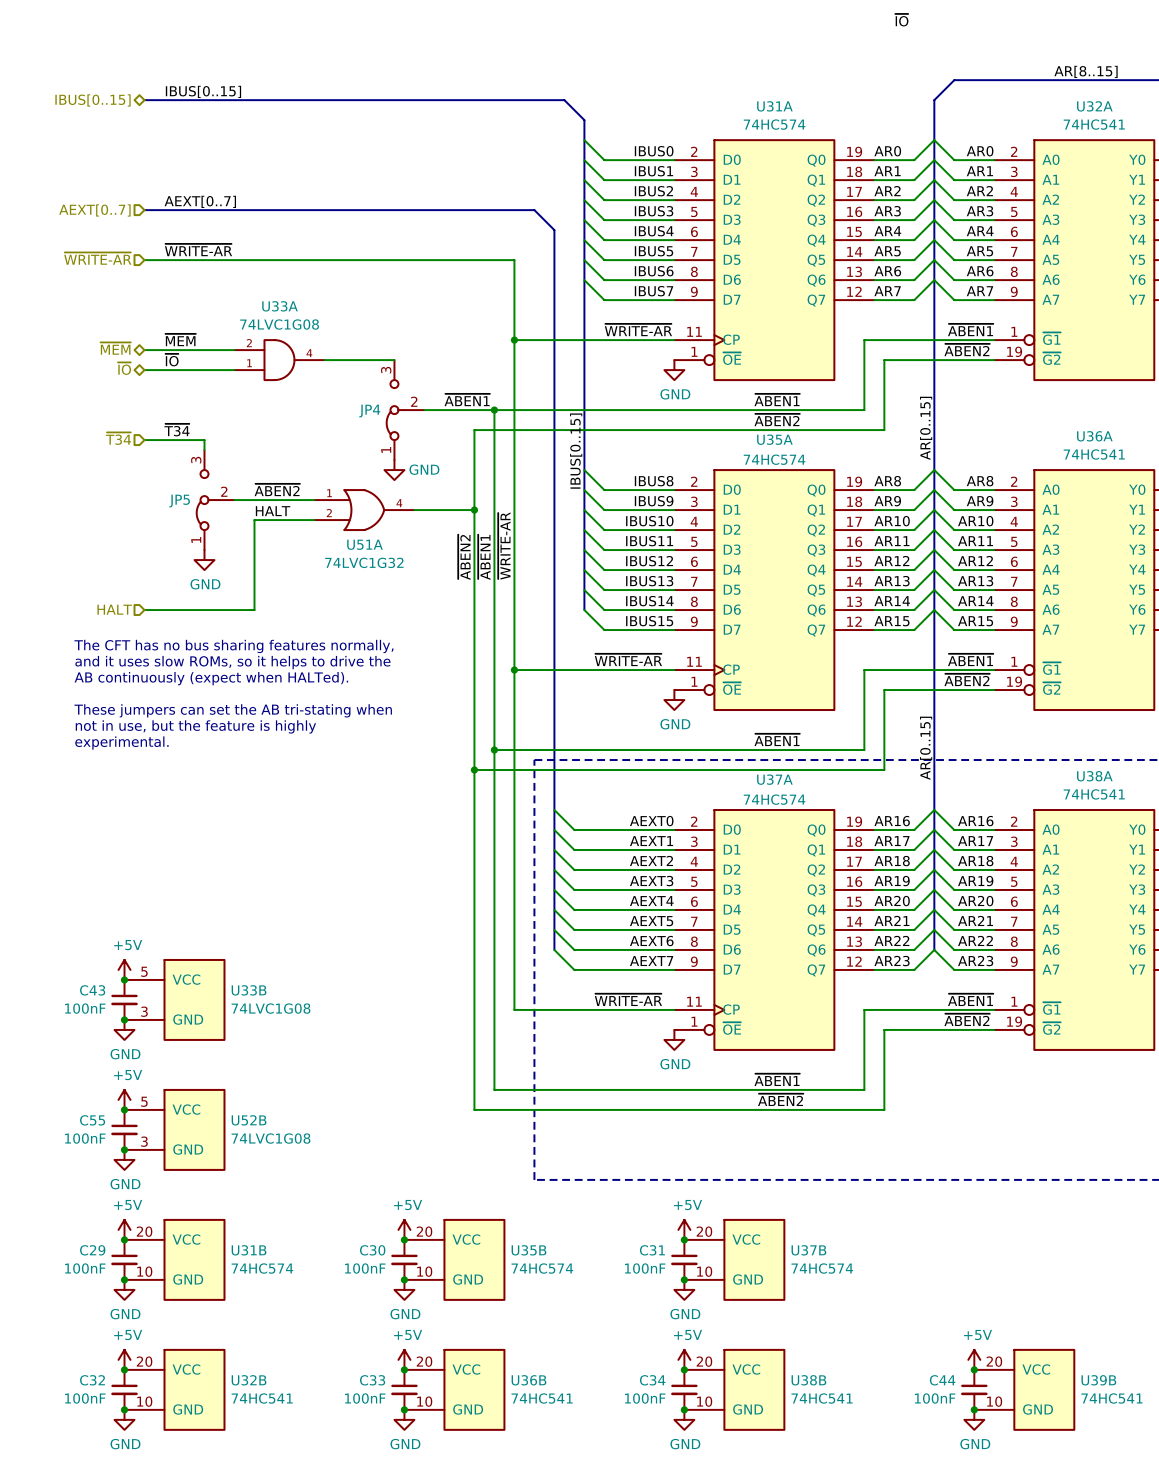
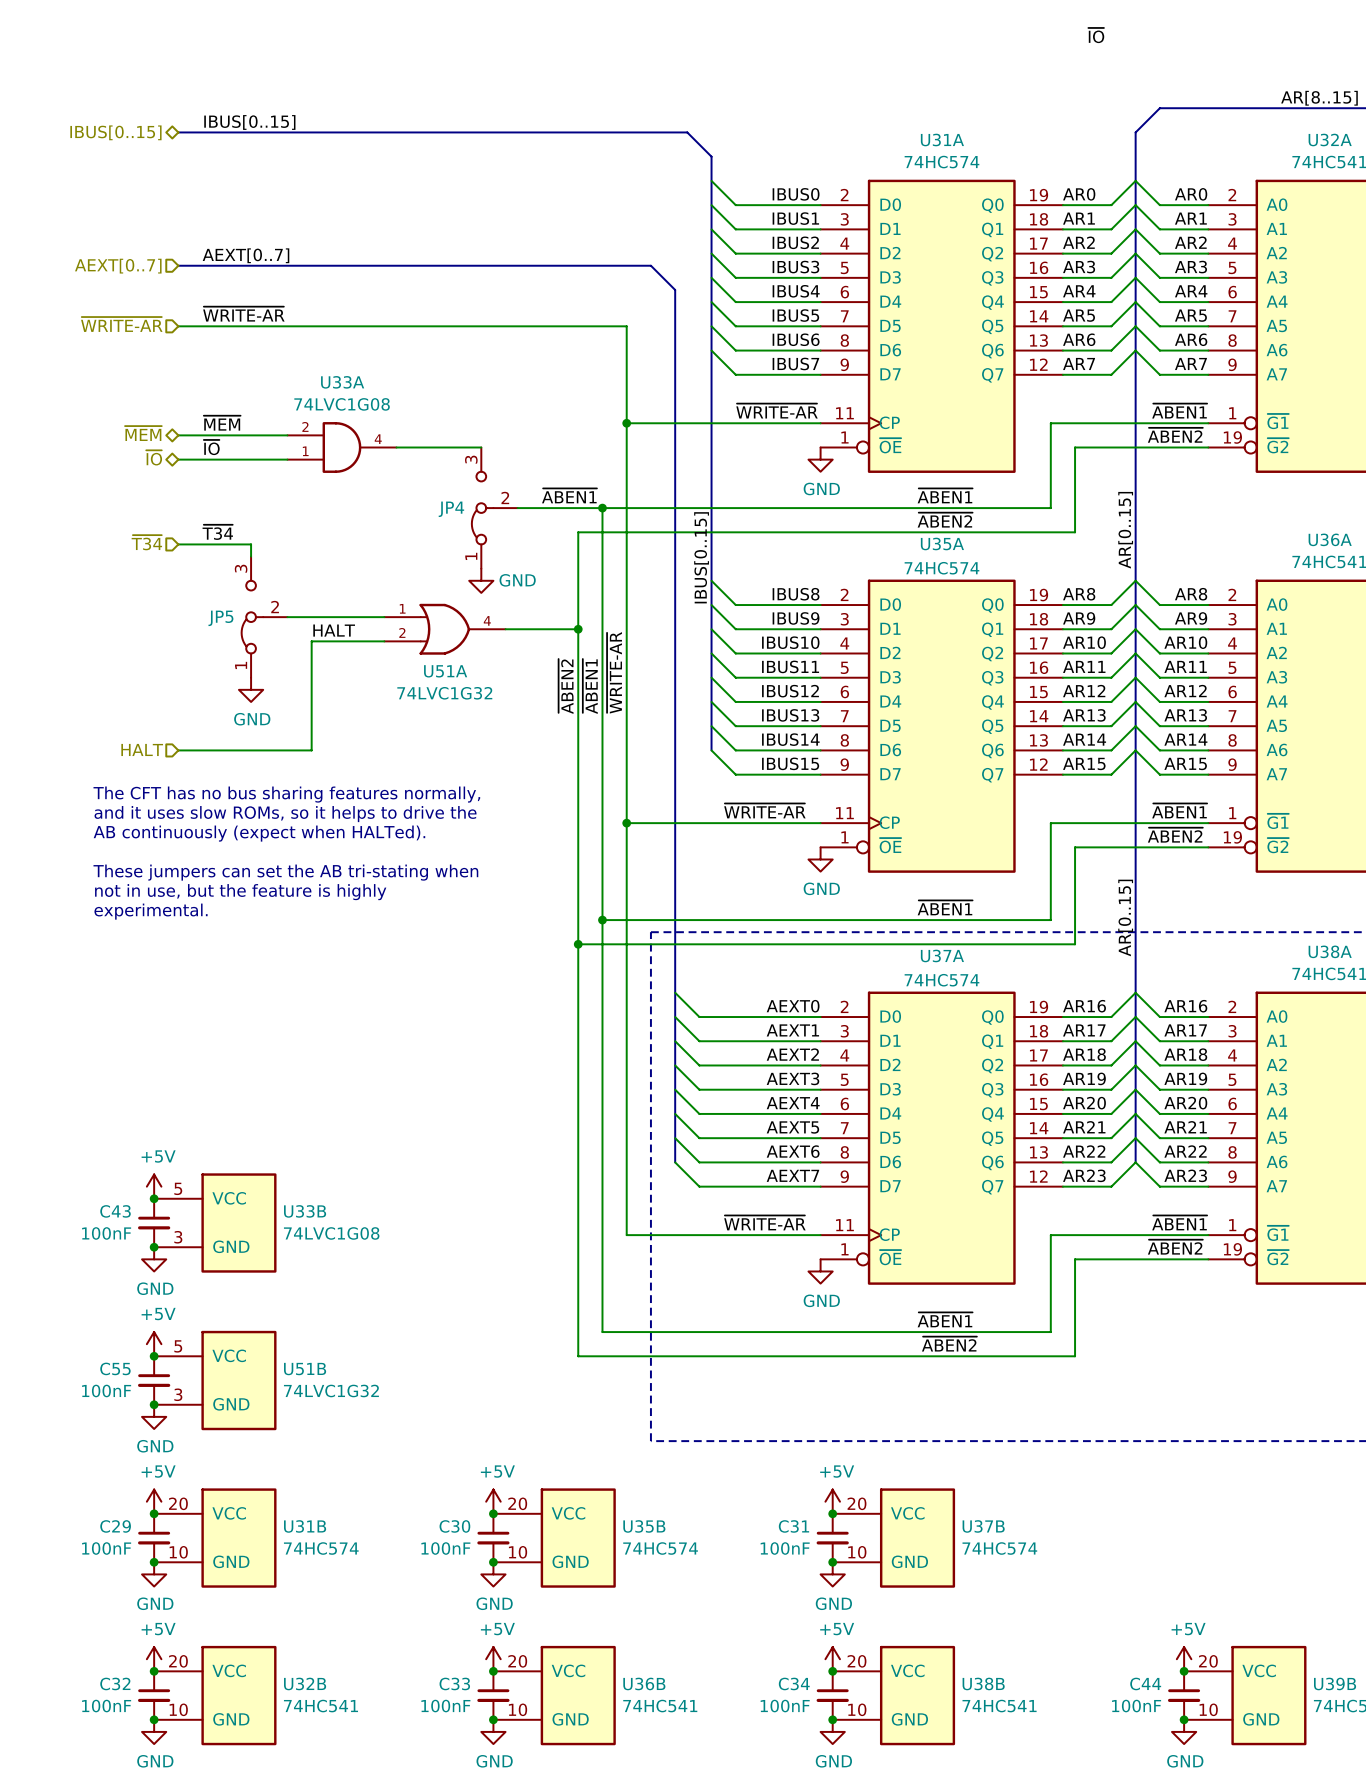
label: ~{ABEN2} (277, 489) -> none
U52B name: U52B (249, 1120) -> U51B (305, 1369)
U52B value: 74LVC1G08 (271, 1138) -> 74LVC1G32 (331, 1390)

